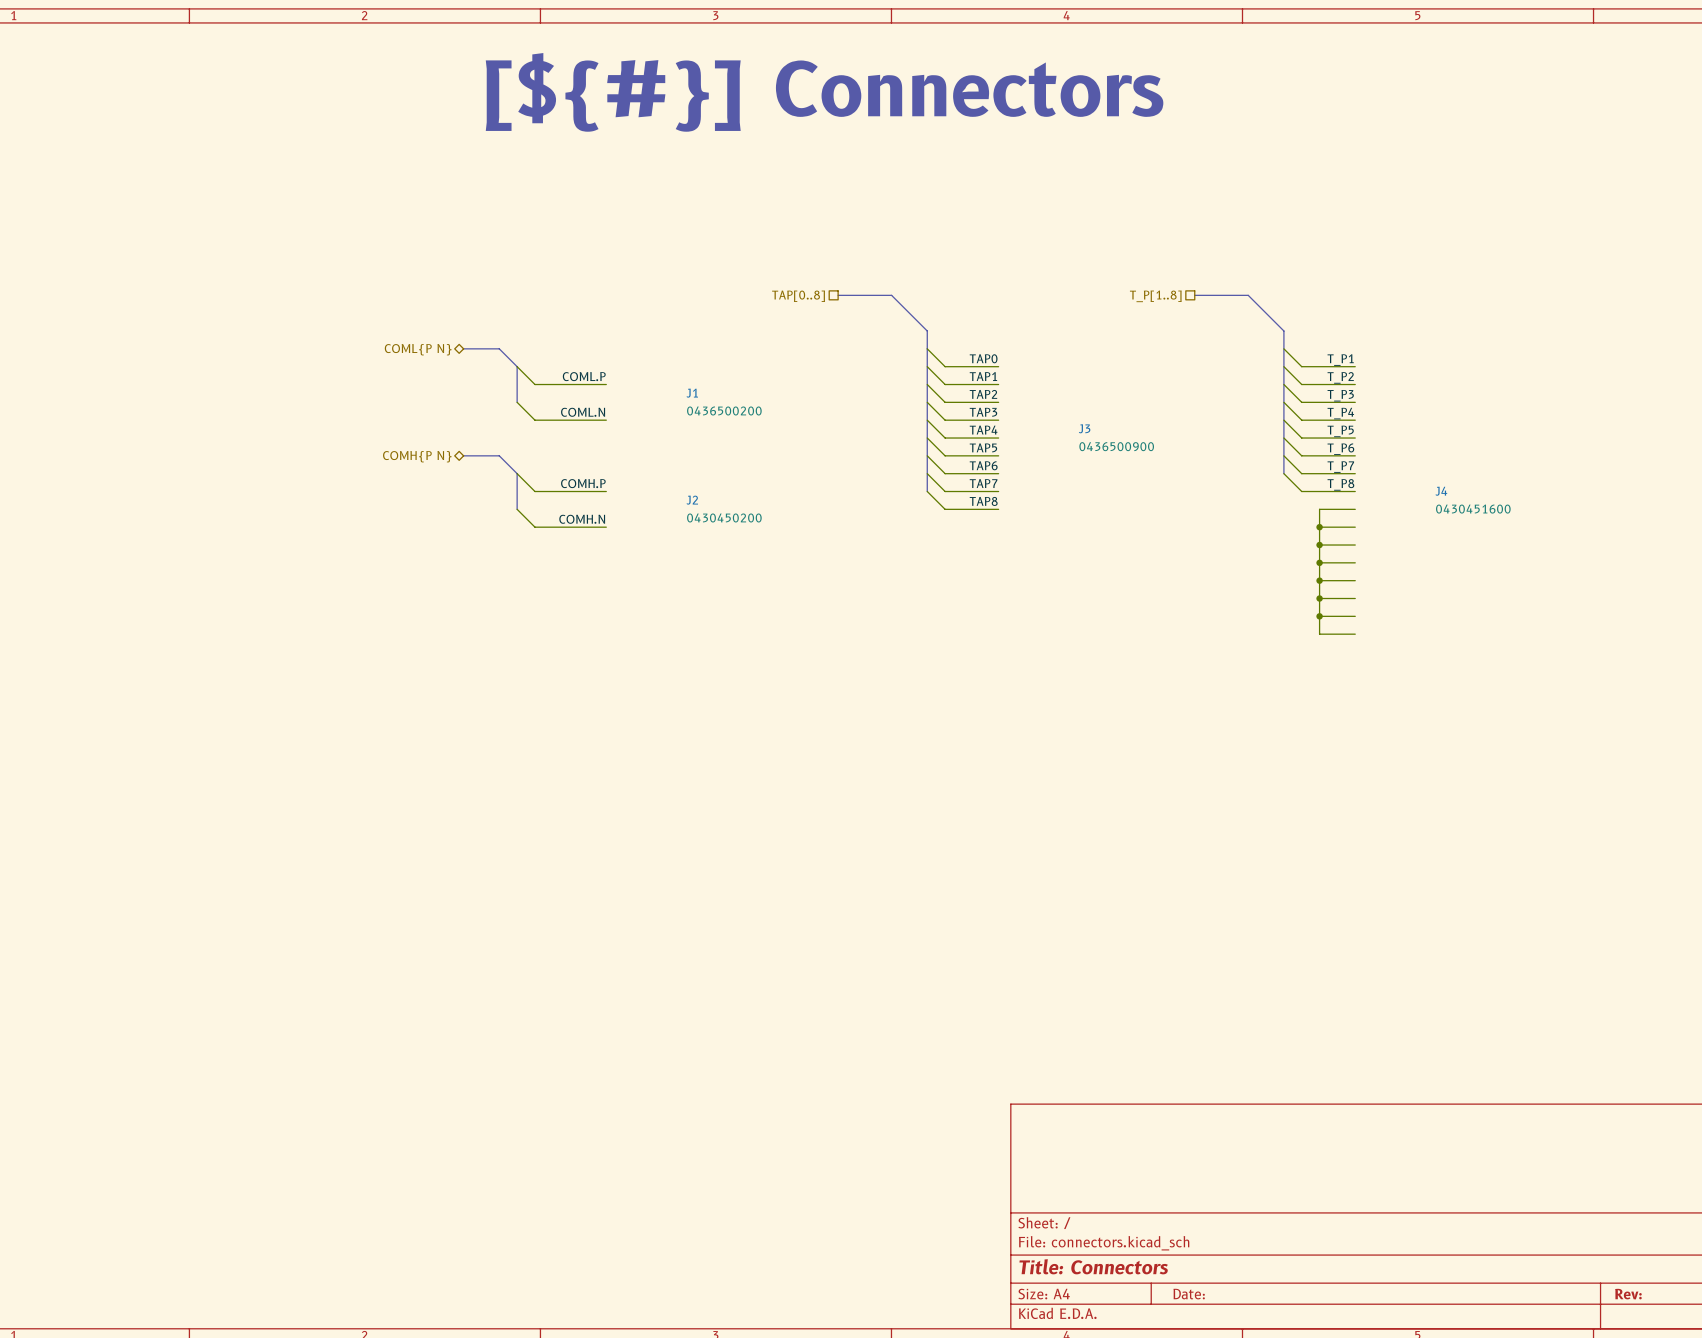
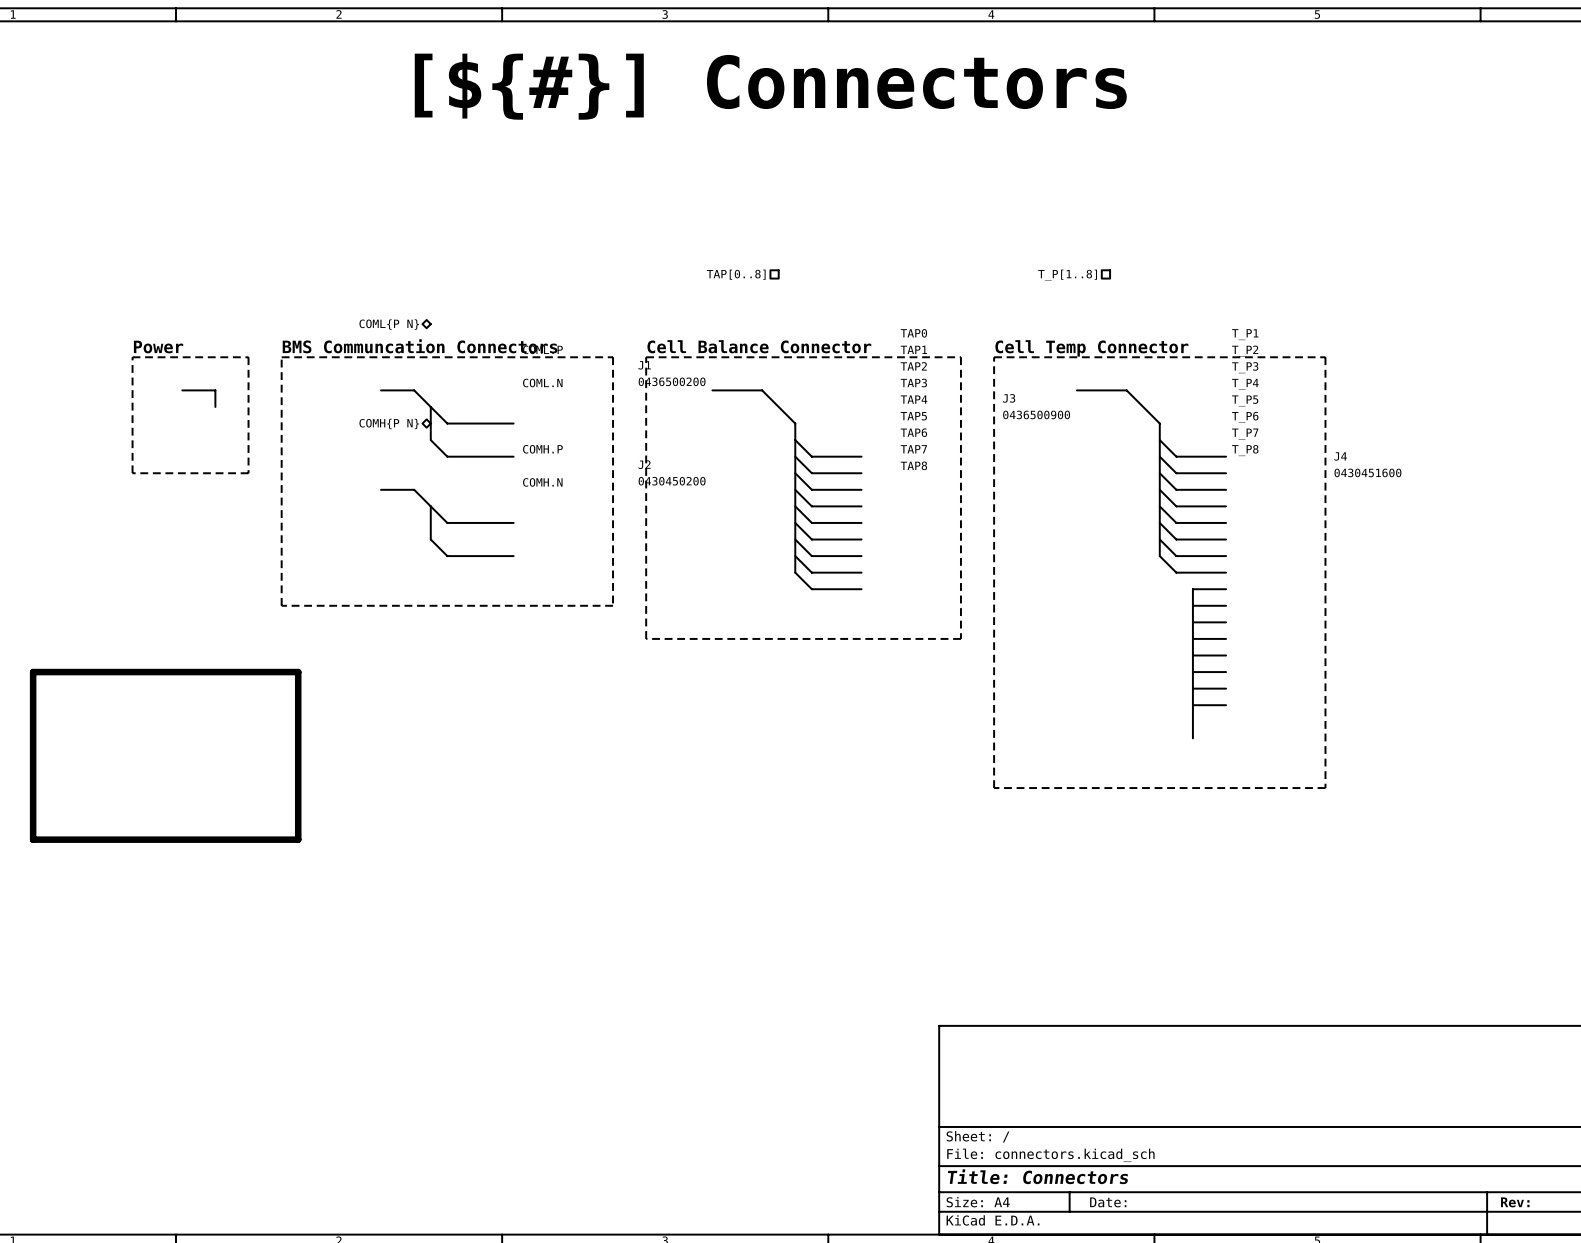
bus: (838, 295) (891, 295) (927, 331) (927, 491) -> (712, 390) (762, 390) (795, 423) (795, 572)
bus: (1194, 295) (1248, 295) (1283, 331) (1283, 473) -> (1076, 390) (1126, 390) (1159, 423) (1159, 556)
bus: (463, 348) (499, 348) (517, 366) (517, 402) -> (381, 390) (414, 390) (430, 406) (430, 440)
wire: (927, 348) (945, 366) (998, 366) -> none
wire: (1283, 348) (1301, 366) (1355, 366) -> (1159, 456) (1176, 473) (1226, 473)
wire: (927, 366) (945, 384) (998, 384) -> (795, 456) (811, 473) (861, 473)
wire: (1283, 366) (1301, 384) (1355, 384) -> none
text: none -> Cell Balance Connector (759, 346)
text: none -> Power (158, 347)
text: none -> BMS Communcation Connectors (420, 346)
text: none -> Cell Temp Connector (1091, 348)
line: none -> (132, 357) (248, 357) (248, 473) (132, 473) (132, 357)
line: none -> (281, 357) (613, 357) (613, 605) (281, 605) (281, 357)
line: none -> (646, 357) (960, 357) (960, 638) (646, 638) (646, 357)
wire: (927, 384) (945, 402) (998, 402) -> (795, 473) (811, 489) (861, 489)
line: none -> (994, 357) (1325, 357) (1325, 788) (994, 788) (994, 357)
wire: (1283, 384) (1301, 402) (1355, 402) -> none
wire: (517, 402) (534, 420) (606, 420) -> (430, 406) (447, 423) (513, 423)
wire: (927, 402) (945, 420) (998, 420) -> (795, 489) (811, 506) (861, 506)
wire: (1283, 402) (1301, 420) (1355, 420) -> none
wire: none -> (182, 390) (215, 390) (215, 406)
wire: (927, 420) (945, 438) (998, 438) -> (795, 506) (811, 522) (861, 522)
wire: (1283, 420) (1301, 438) (1355, 438) -> none
wire: (927, 438) (945, 455) (998, 455) -> (795, 522) (811, 539) (861, 539)
wire: (1283, 438) (1301, 455) (1355, 455) -> none
bus: (463, 455) (499, 455) (517, 473) (517, 509) -> (381, 489) (414, 489) (430, 506) (430, 539)
wire: (927, 455) (945, 473) (998, 473) -> (795, 539) (811, 556) (861, 556)
wire: (1283, 455) (1301, 473) (1355, 473) -> none
wire: (517, 473) (534, 491) -> (430, 440) (447, 456) (497, 456)
wire: (927, 473) (945, 491) (998, 491) -> (795, 556) (811, 572) (861, 572)
wire: (1283, 473) (1301, 491) -> (1159, 440) (1176, 456) (1209, 456)
wire: (552, 491) (606, 491) -> none
wire: (927, 491) (945, 509) (998, 509) -> (861, 456) (811, 456) (795, 440)
wire: (1319, 491) (1355, 491) -> (1192, 605) (1226, 605)
wire: (517, 509) (534, 527) (606, 527) -> (430, 506) (447, 522) (513, 522)
wire: (1355, 509) (1319, 509) (1319, 634) (1355, 634) -> none
wire: (1319, 527) (1355, 527) -> (1226, 489) (1176, 489) (1159, 473)
junction: (1319, 527) -> none
wire: (1319, 545) (1355, 545) -> (1226, 506) (1176, 506) (1159, 489)
junction: (1319, 545) -> none
wire: (1319, 562) (1355, 562) -> (1226, 522) (1176, 522) (1159, 506)
junction: (1319, 562) -> none
wire: none -> (430, 539) (447, 556) (513, 556)
wire: (1319, 580) (1355, 580) -> (1226, 539) (1176, 539) (1159, 522)
junction: (1319, 580) -> none
wire: (1319, 598) (1355, 598) -> (1226, 556) (1176, 556) (1159, 539)
junction: (1319, 598) -> none
wire: none -> (795, 572) (811, 589) (861, 589)
wire: (1319, 616) (1355, 616) -> (1226, 572) (1176, 572) (1159, 556)
junction: (1319, 616) -> none
wire: none -> (1226, 589) (1192, 589) (1192, 738)
wire: none -> (1192, 622) (1226, 622)
wire: none -> (1192, 638) (1226, 638)
wire: none -> (1192, 655) (1226, 655)
line: none -> (33, 672) (298, 672) (298, 839) (33, 839) (33, 672)
wire: none -> (1192, 672) (1226, 672)
wire: none -> (1192, 688) (1226, 688)
wire: none -> (1192, 705) (1226, 705)

